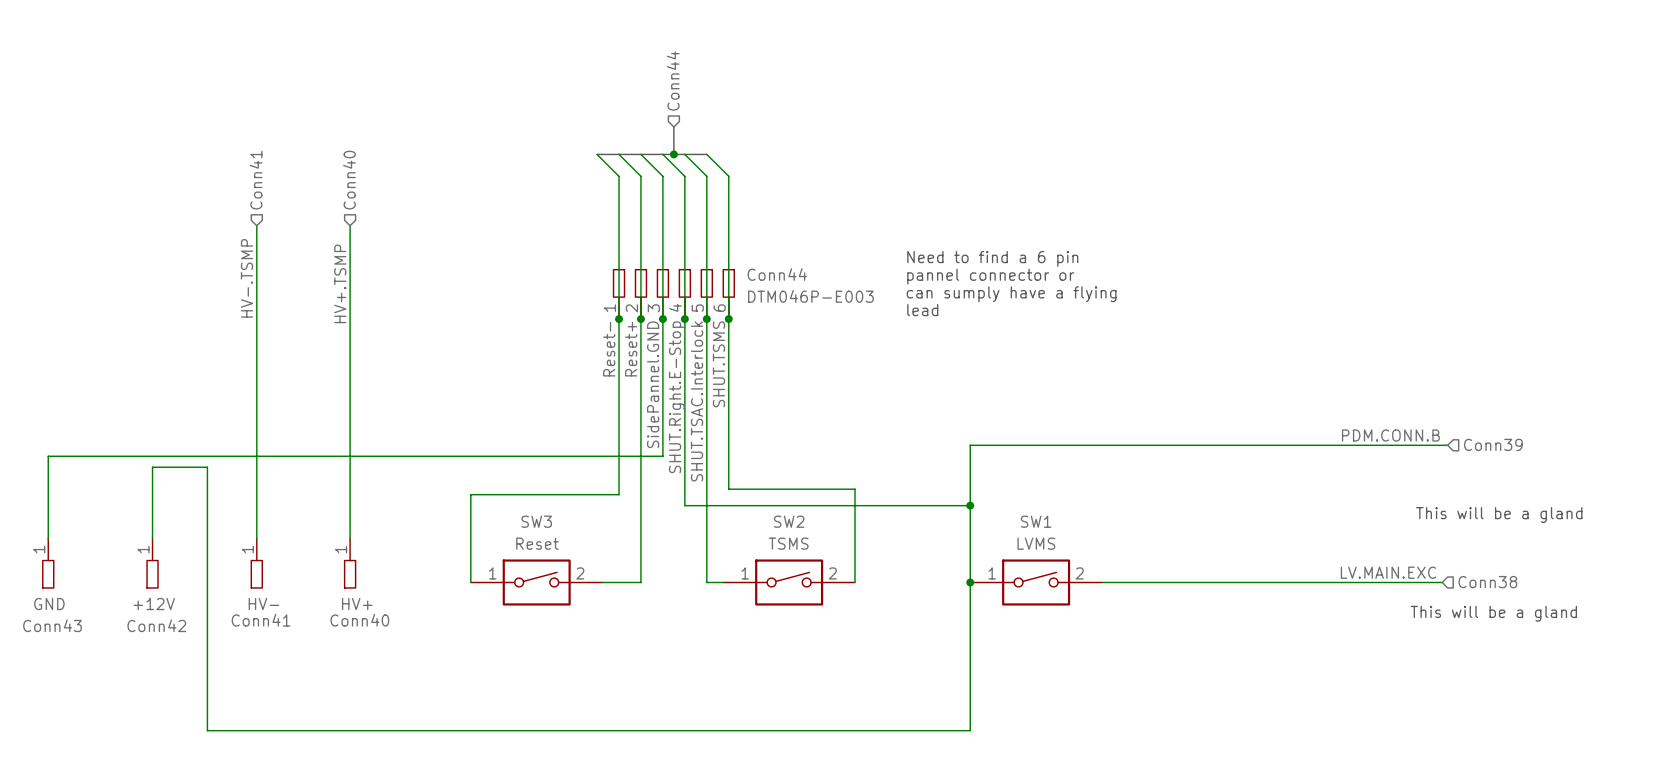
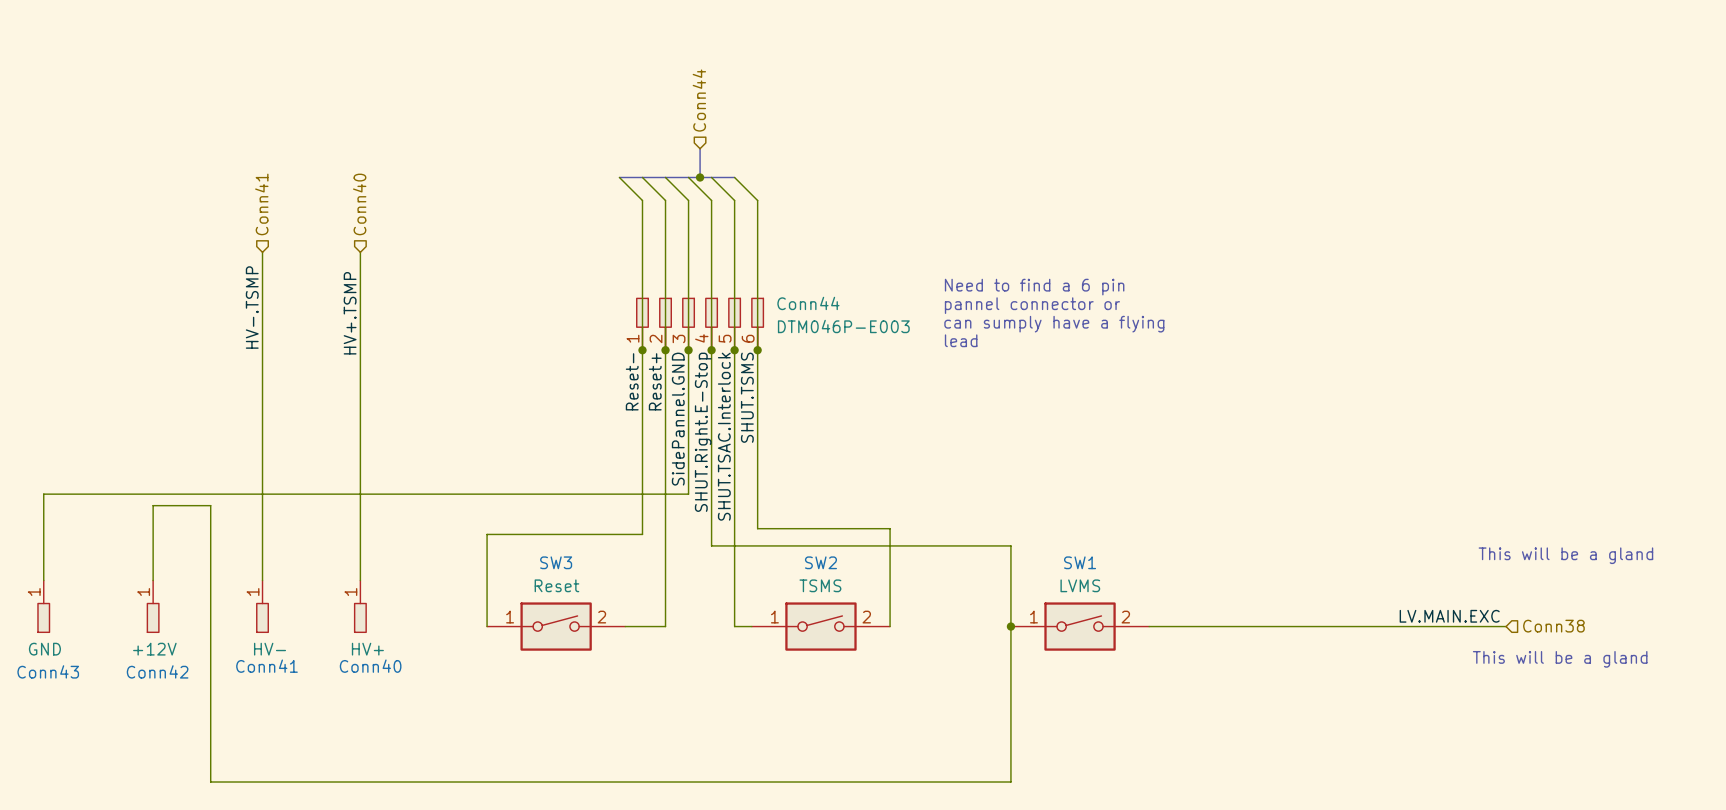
label: PDM.CONN.B (1390, 435) -> none
hierarchical label: Conn39 (1493, 444) -> none
wire: (1447, 445) (970, 445) (970, 505) -> none
junction: (970, 505) -> none

